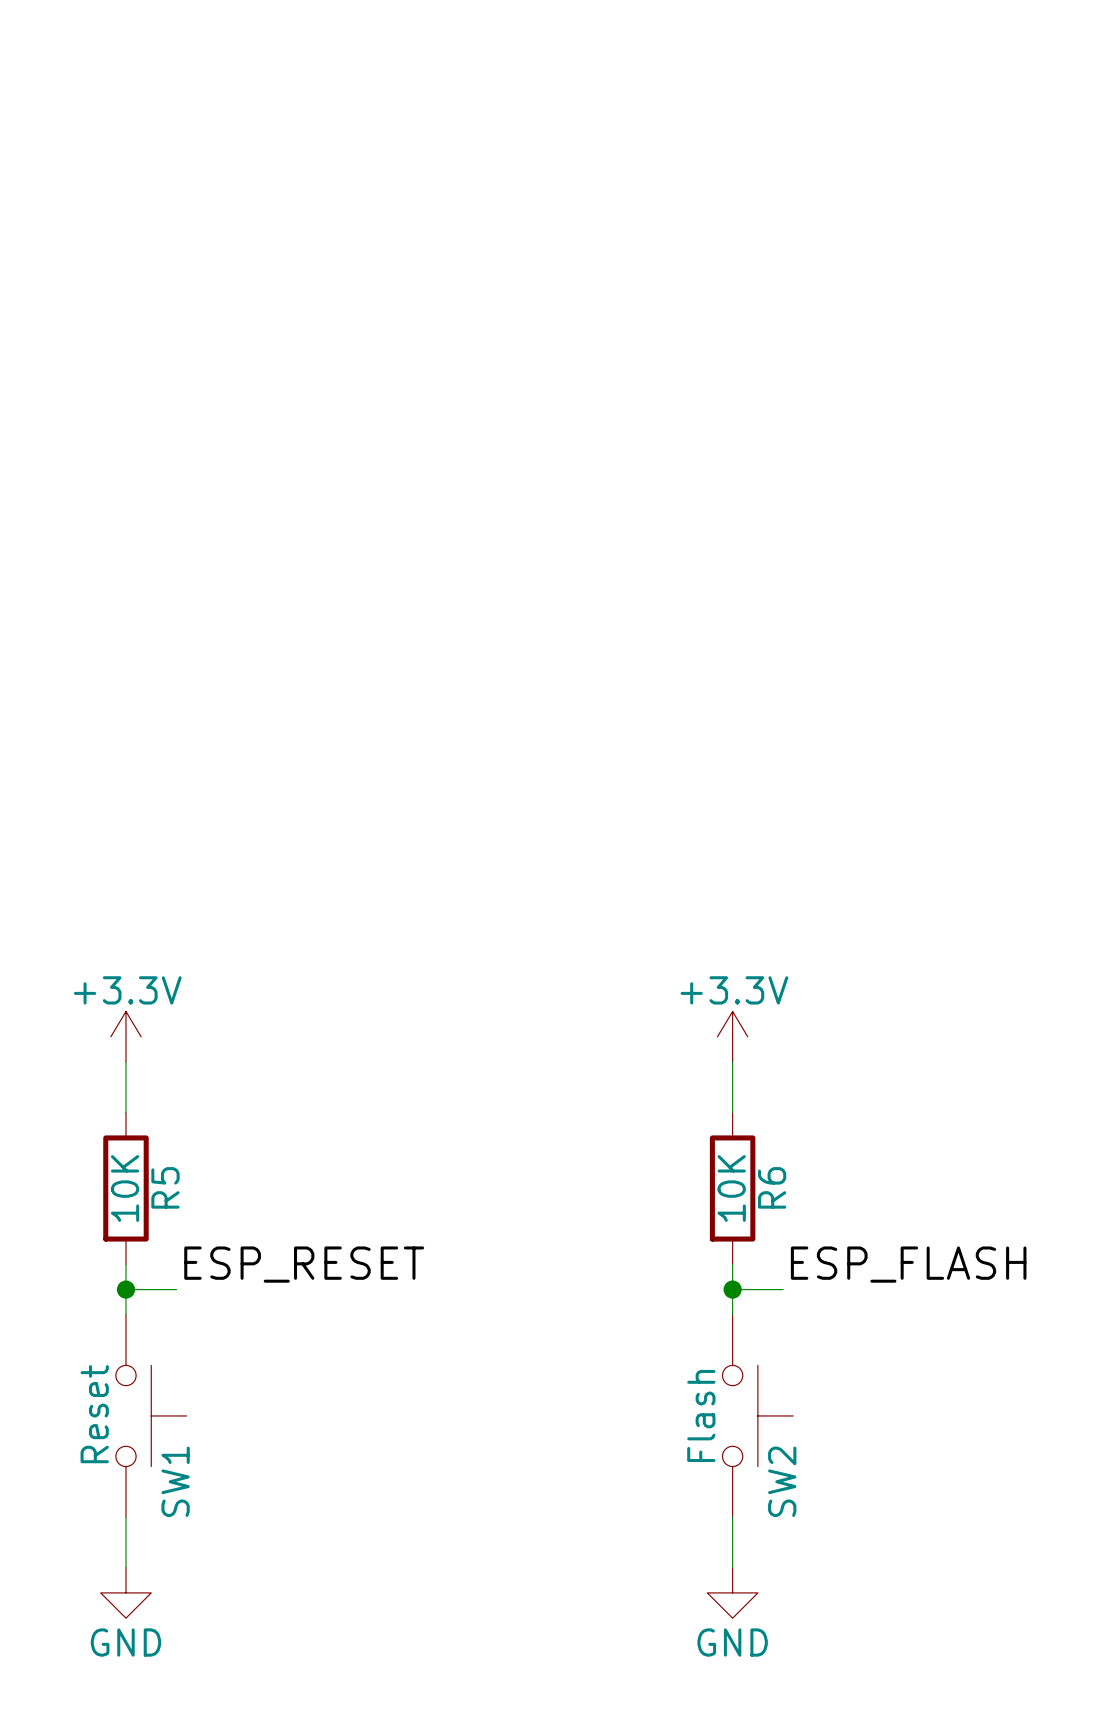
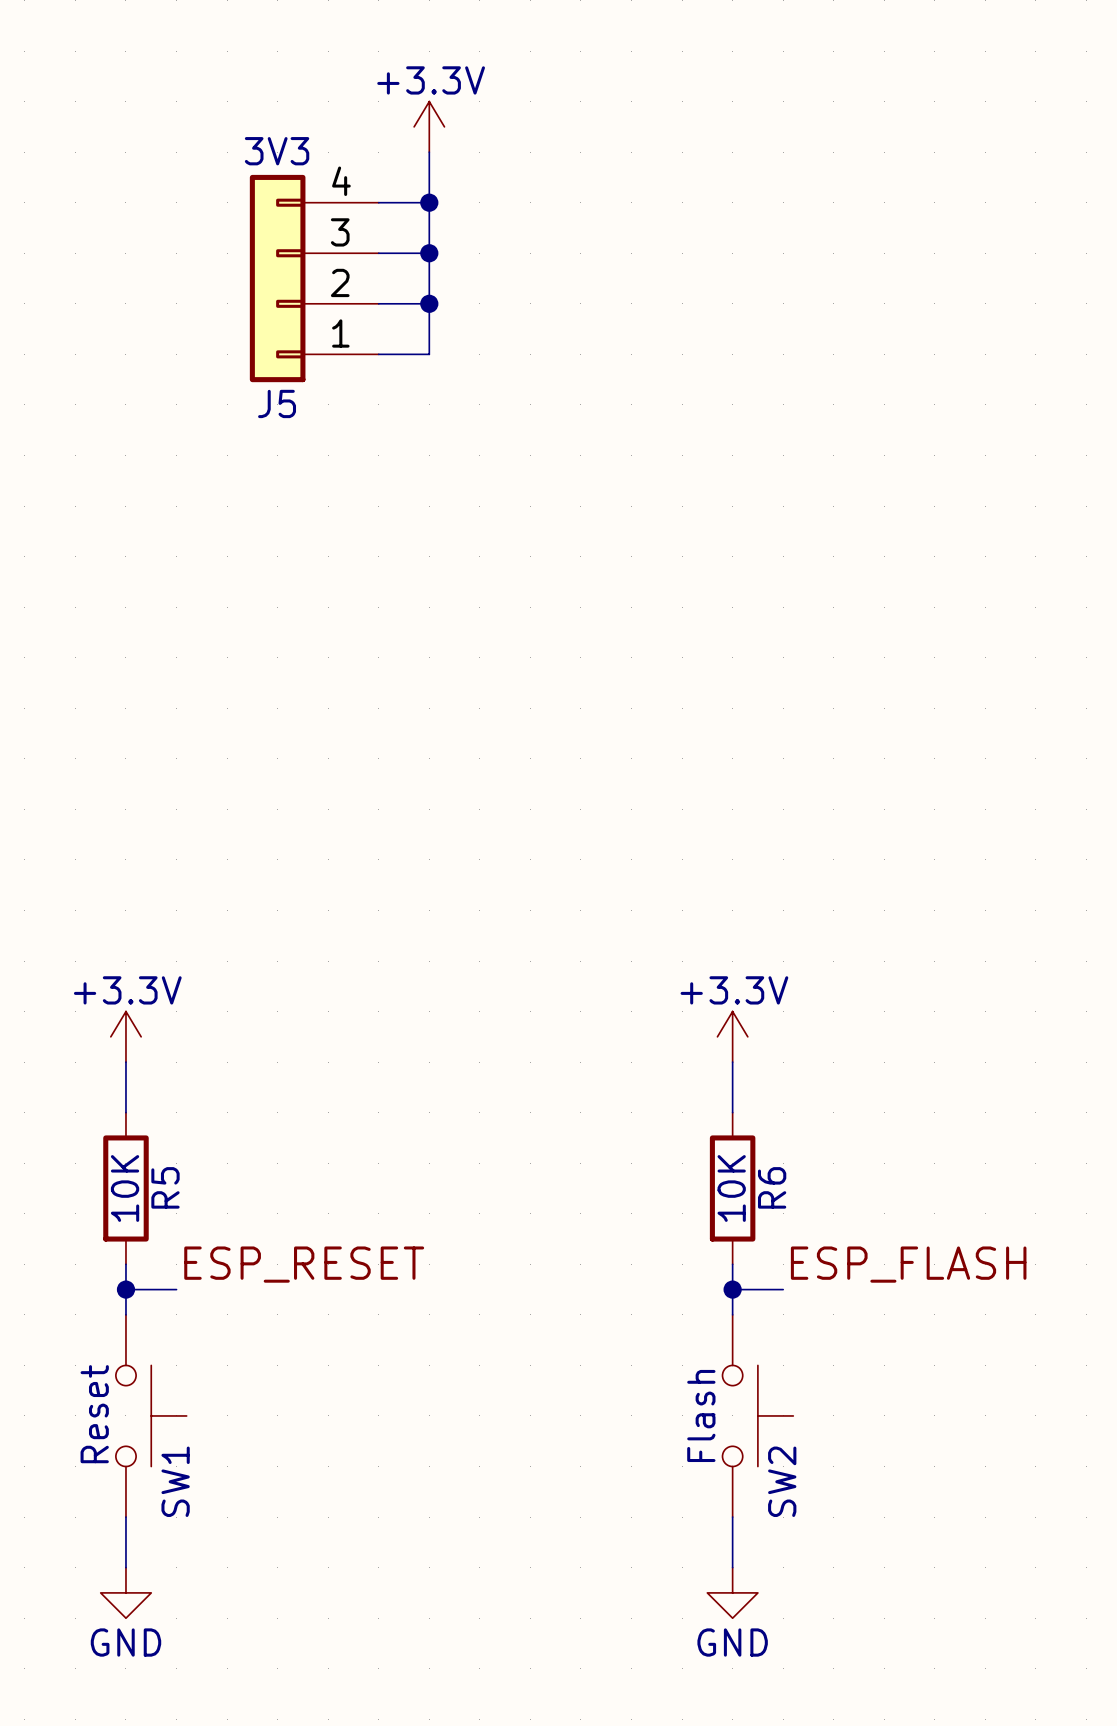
power symbol: none -> +3.3V (429, 126)
wire: none -> (429, 152) (429, 354) (378, 354)
wire: none -> (378, 202) (429, 202)
junction: none -> (429, 202)
wire: none -> (378, 253) (429, 253)
junction: none -> (429, 253)
J5: none -> 3V3 (314, 278)
wire: none -> (378, 303) (429, 303)
junction: none -> (429, 303)

